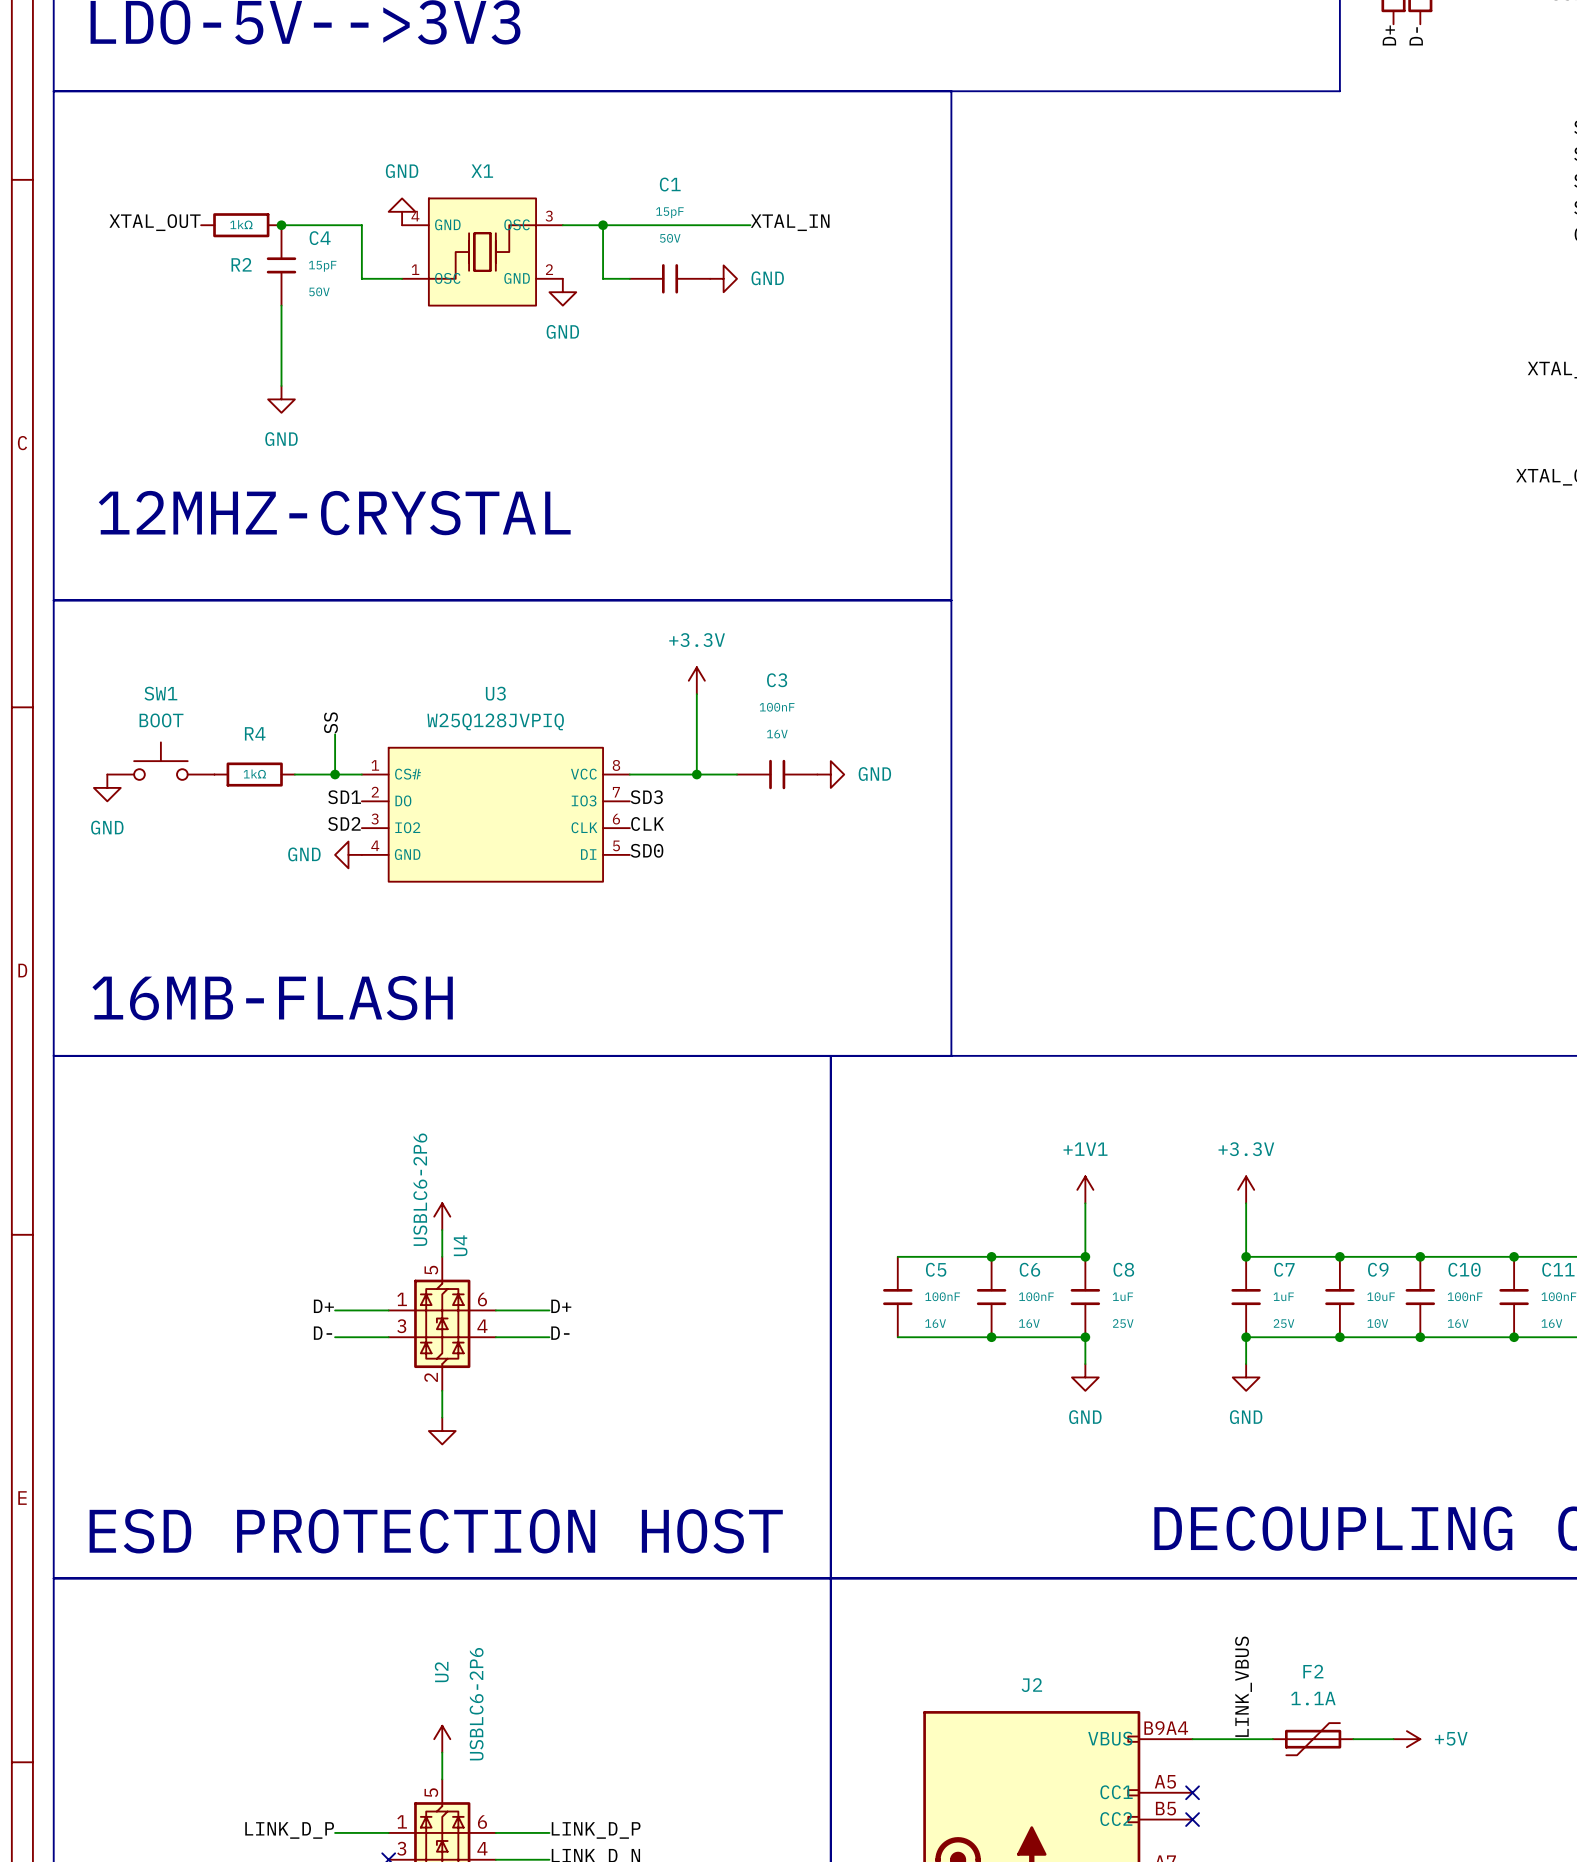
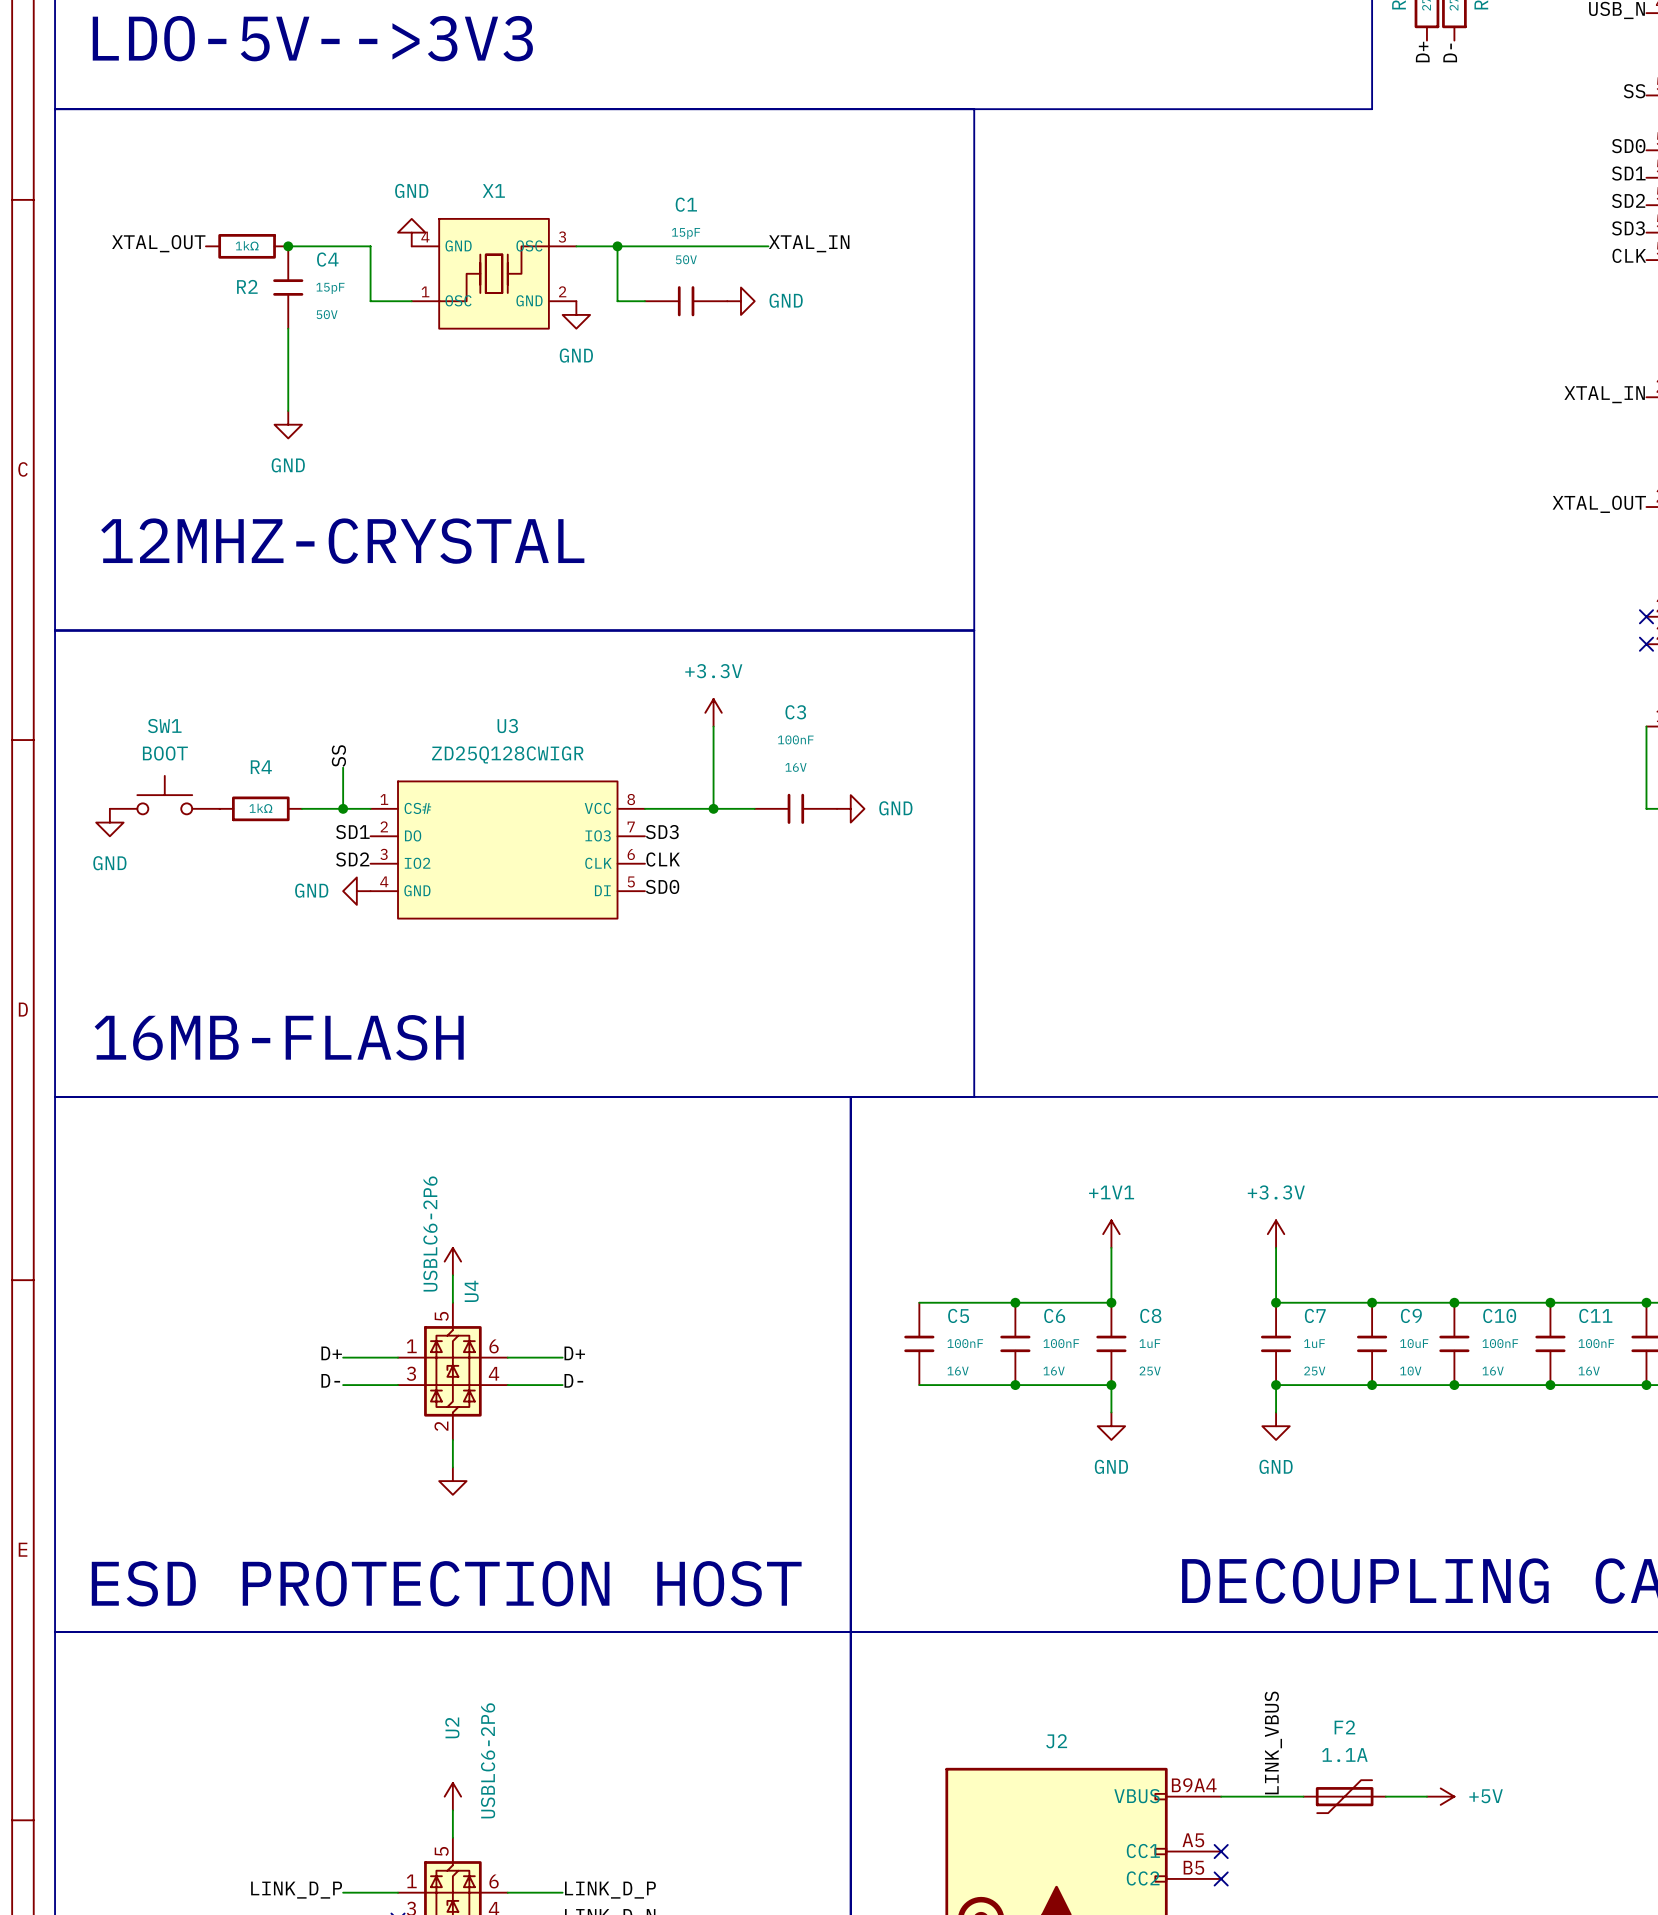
U3 value: W25Q128JVPIQ (495, 721) -> ZD25Q128CWIGR (507, 754)

